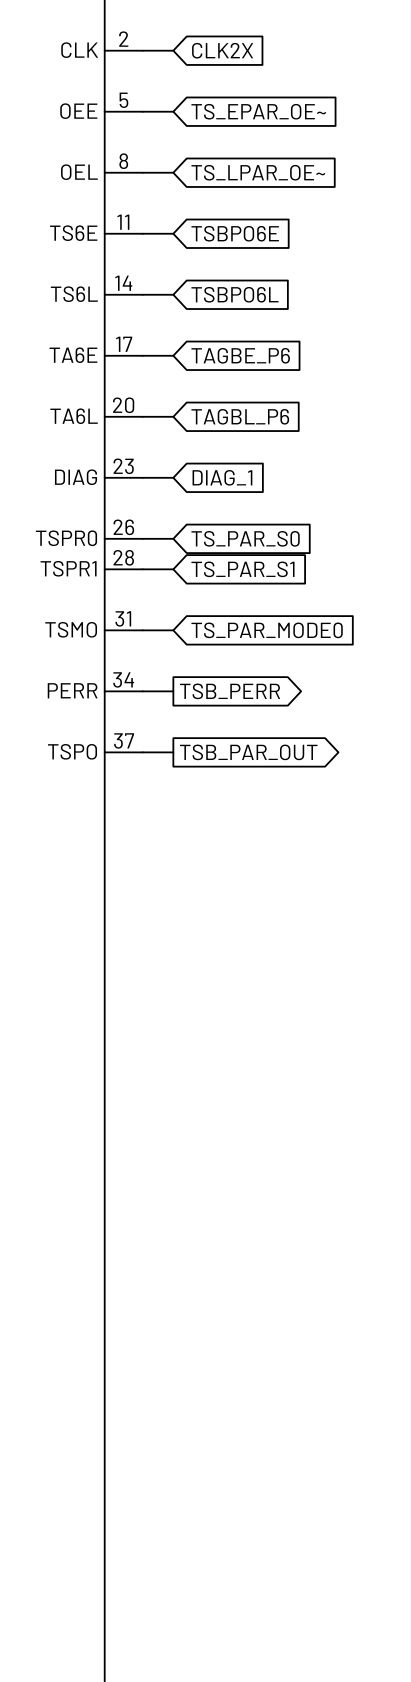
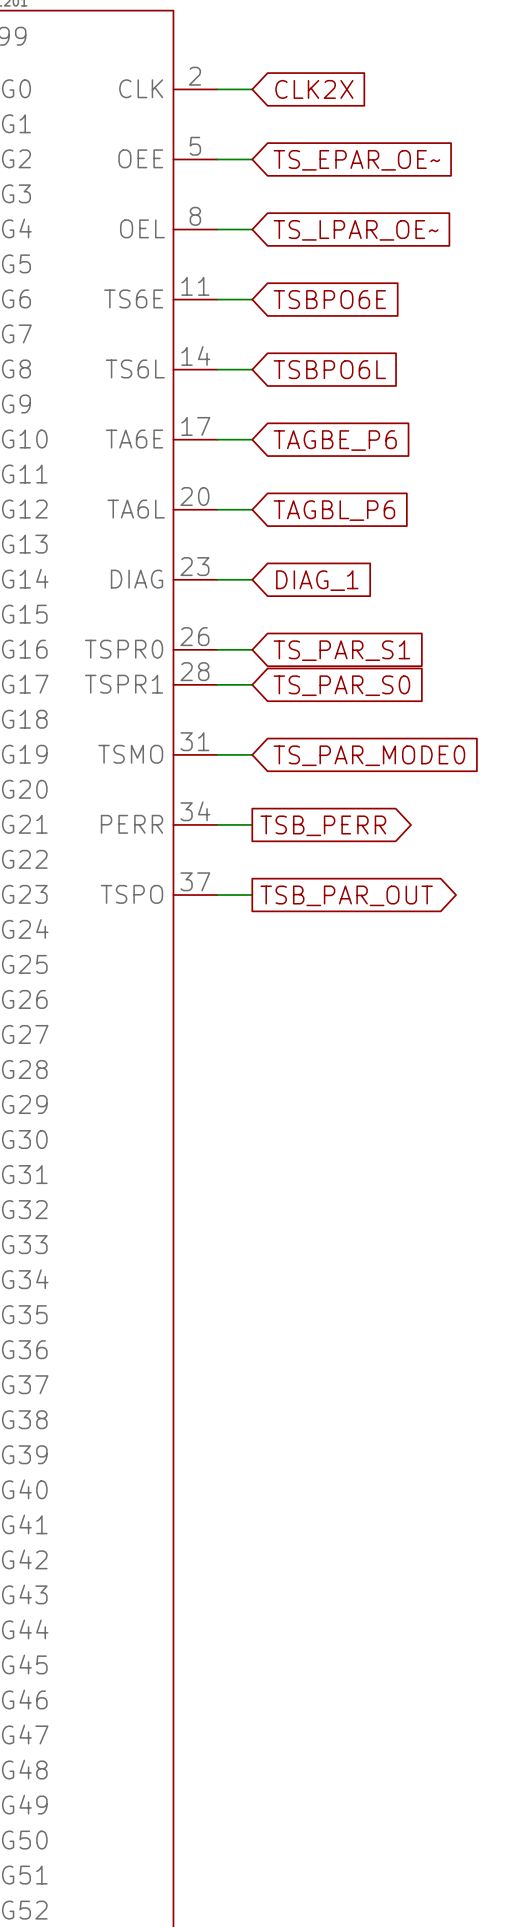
global label: TS_PAR_S0 (245, 538) -> TS_PAR_S1 (341, 650)
global label: TS_PAR_S1 (242, 569) -> TS_PAR_S0 (341, 685)

